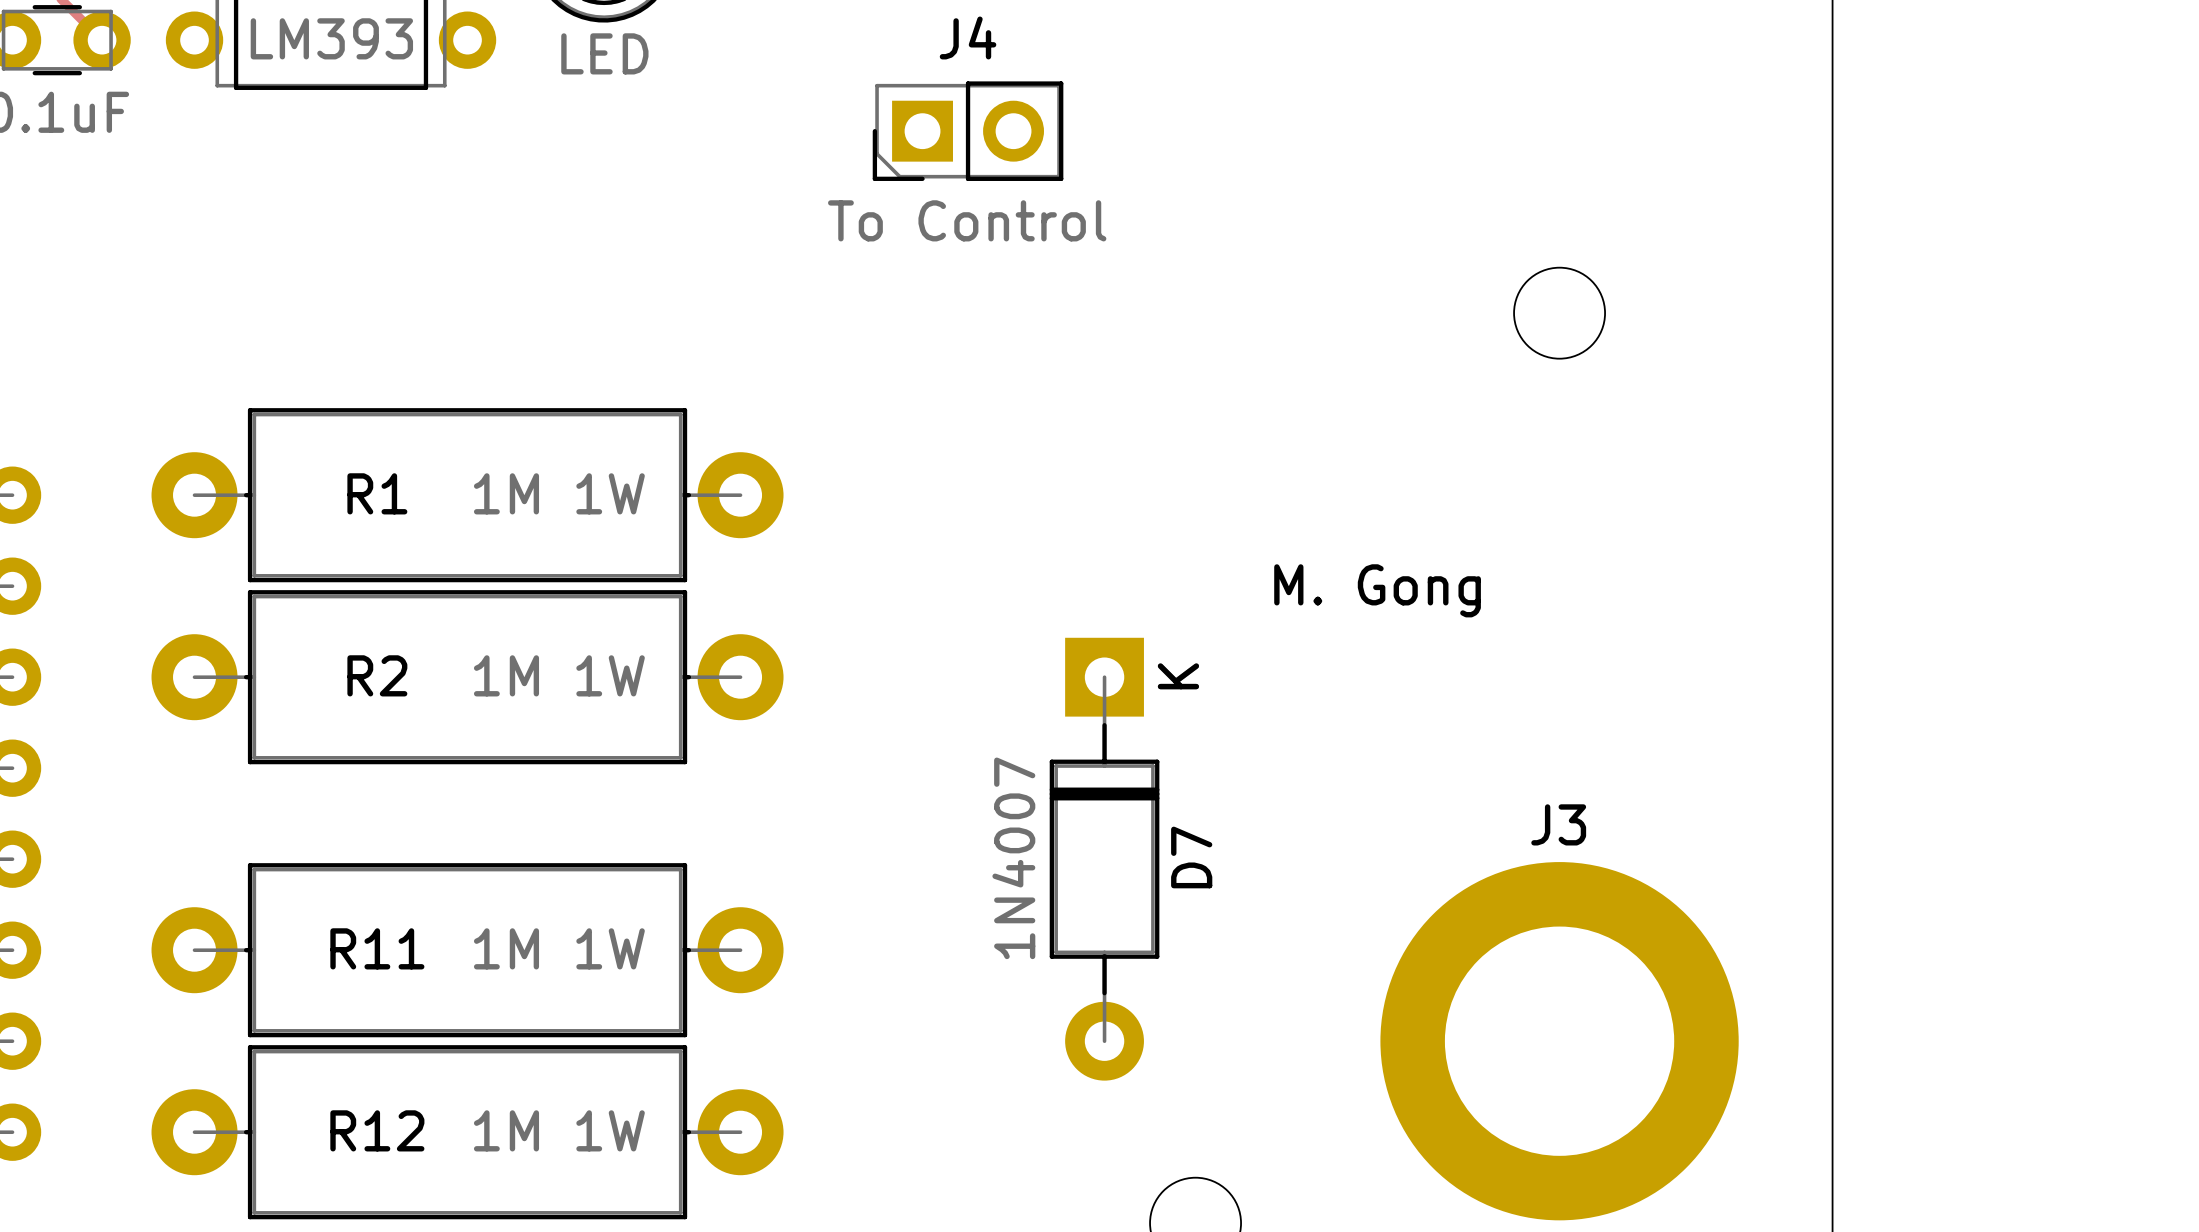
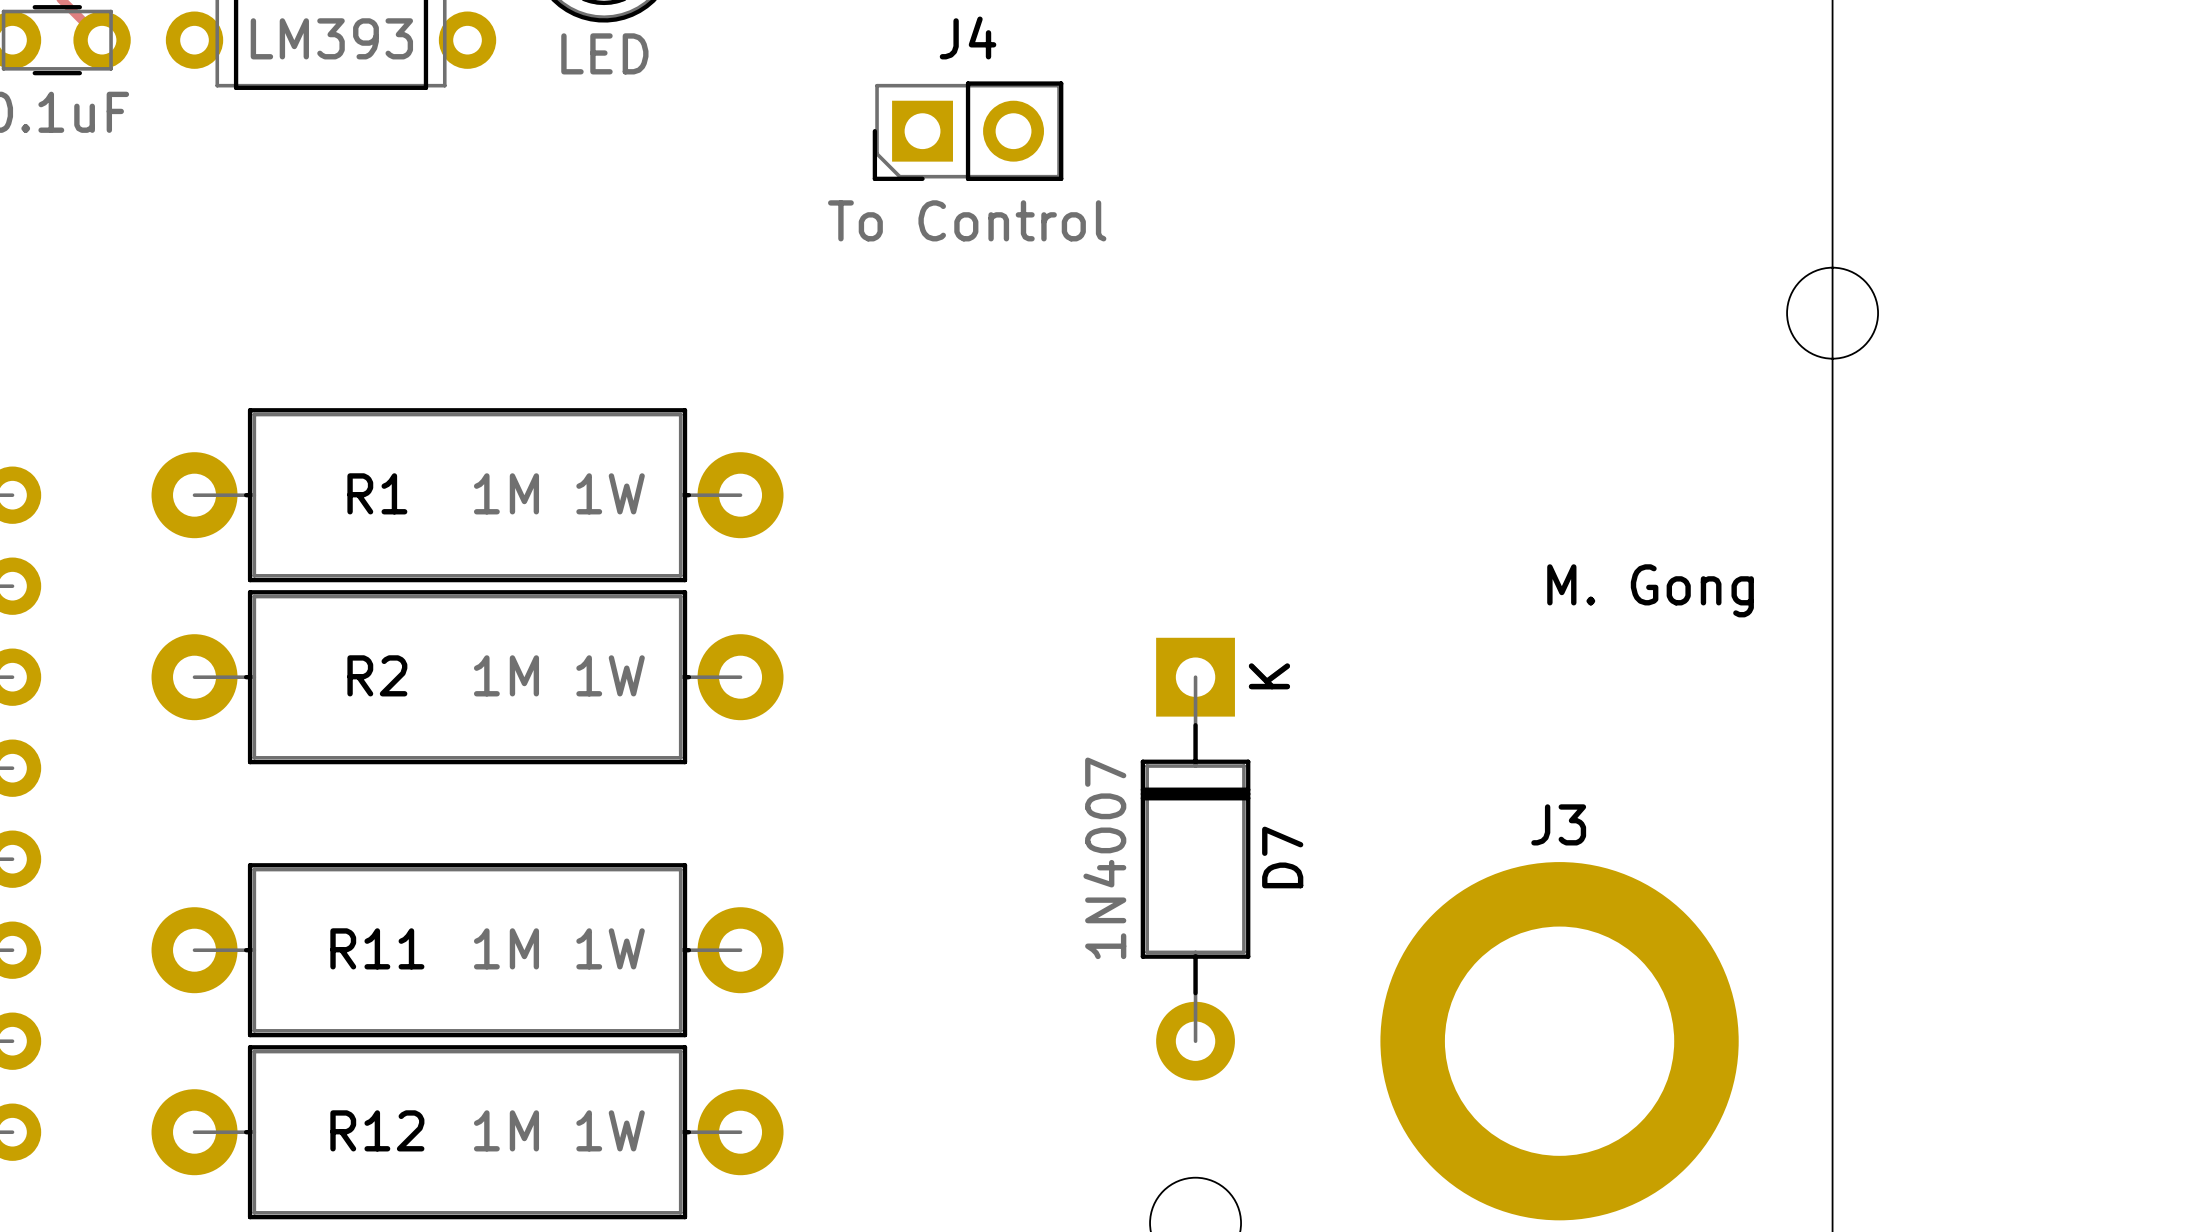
round board edge position: (1559, 313) -> (1832, 313)
text position: M. Gong (1377, 590) -> M. Gong (1650, 590)
D7 position: (1104, 859) -> (1195, 859)

